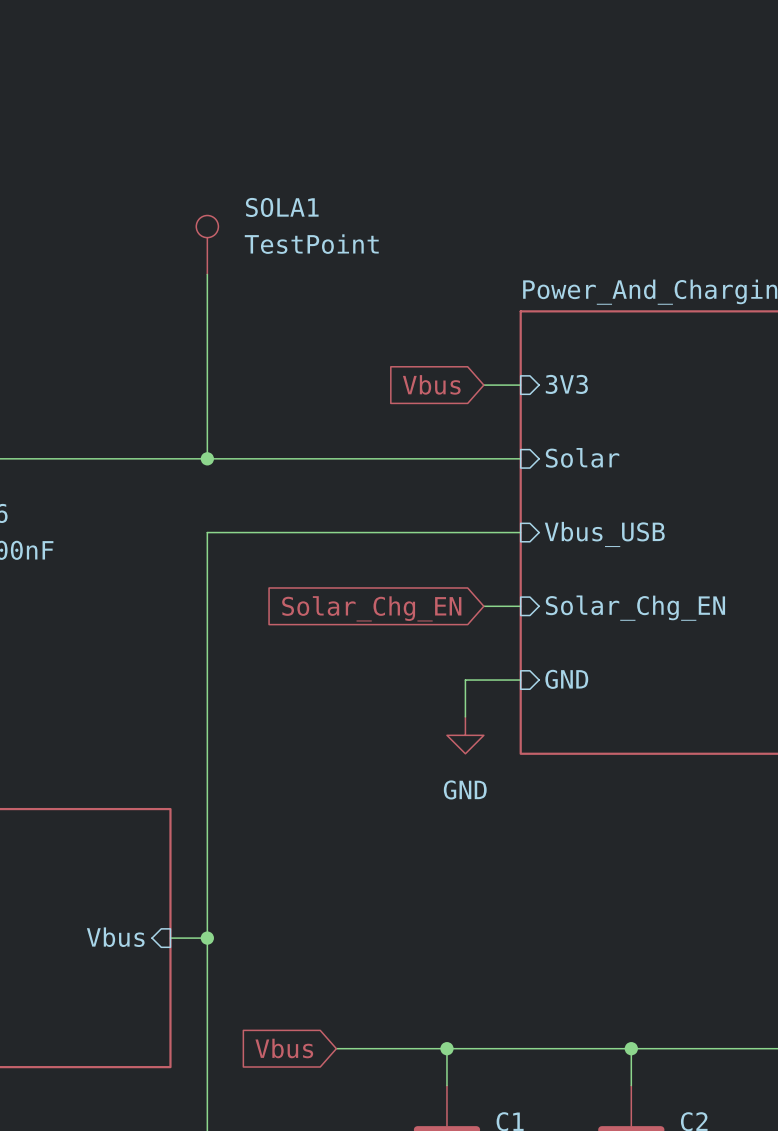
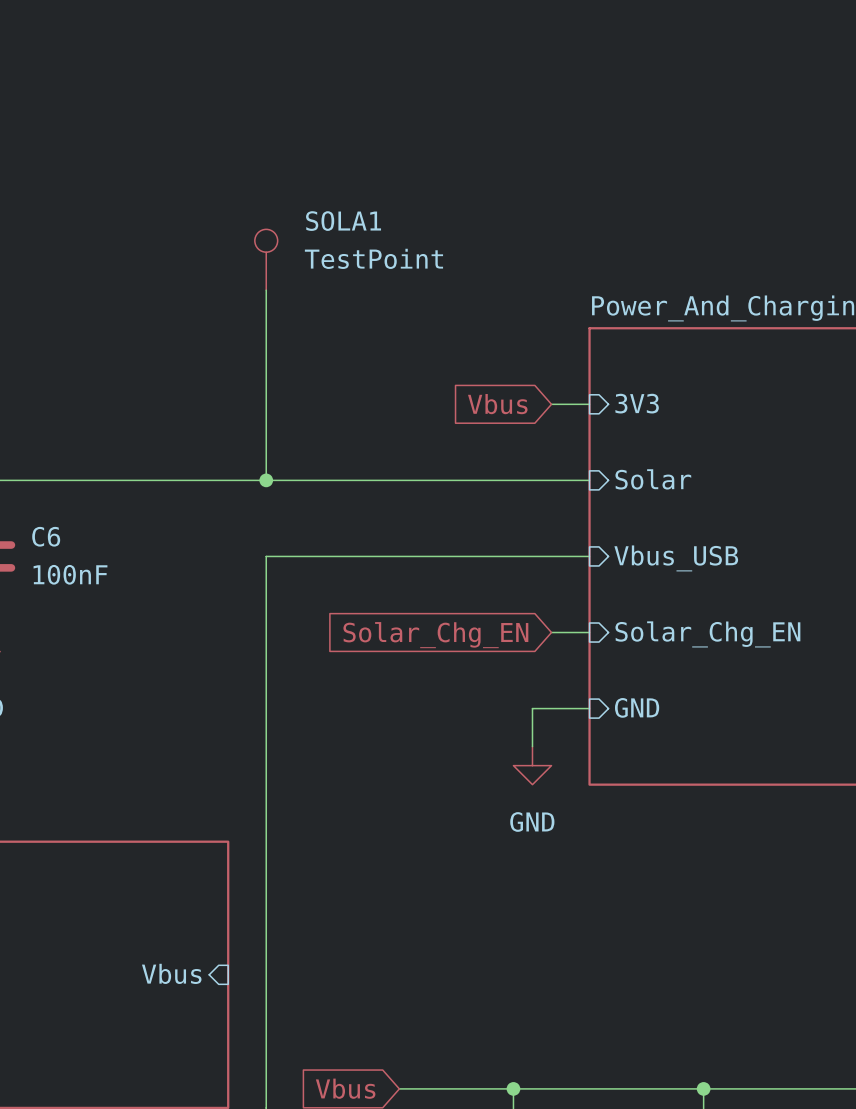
wire: (170, 938) (207, 938) -> none
junction: (207, 938) -> none

